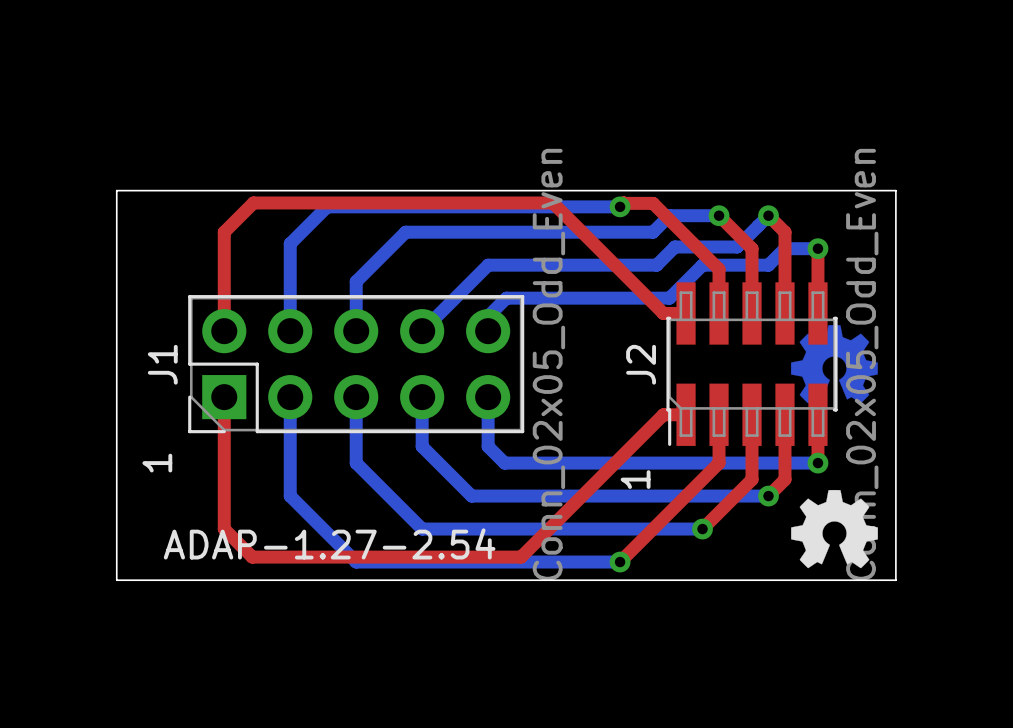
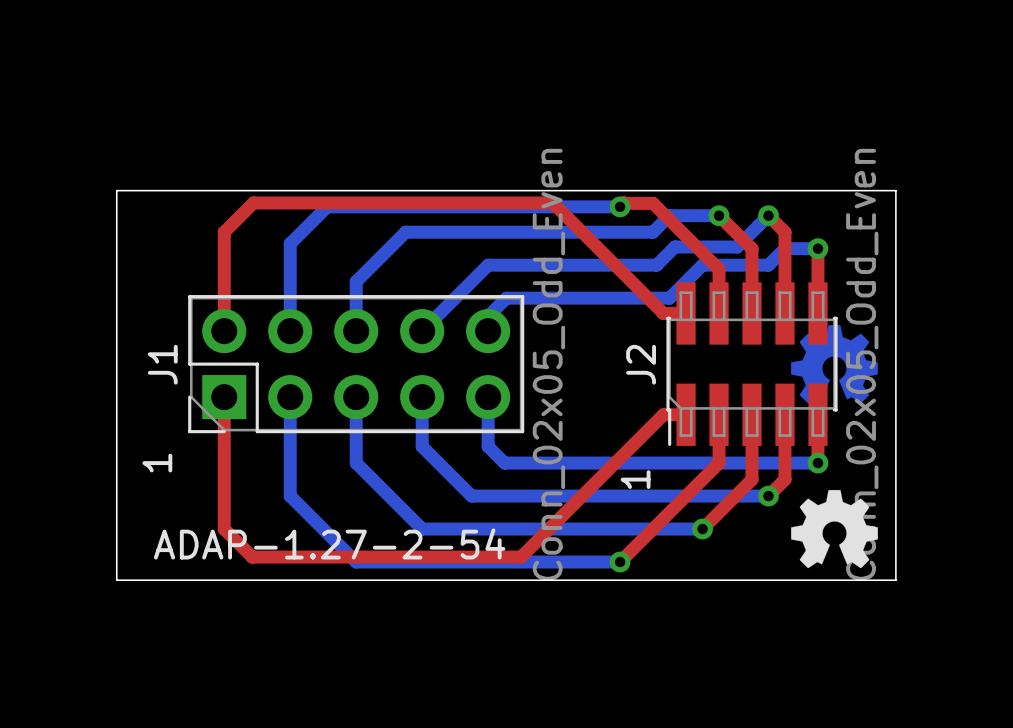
text: ADAP-1.27-2.54 (329, 543) -> ADAP-1.27-2-54 (329, 543)

